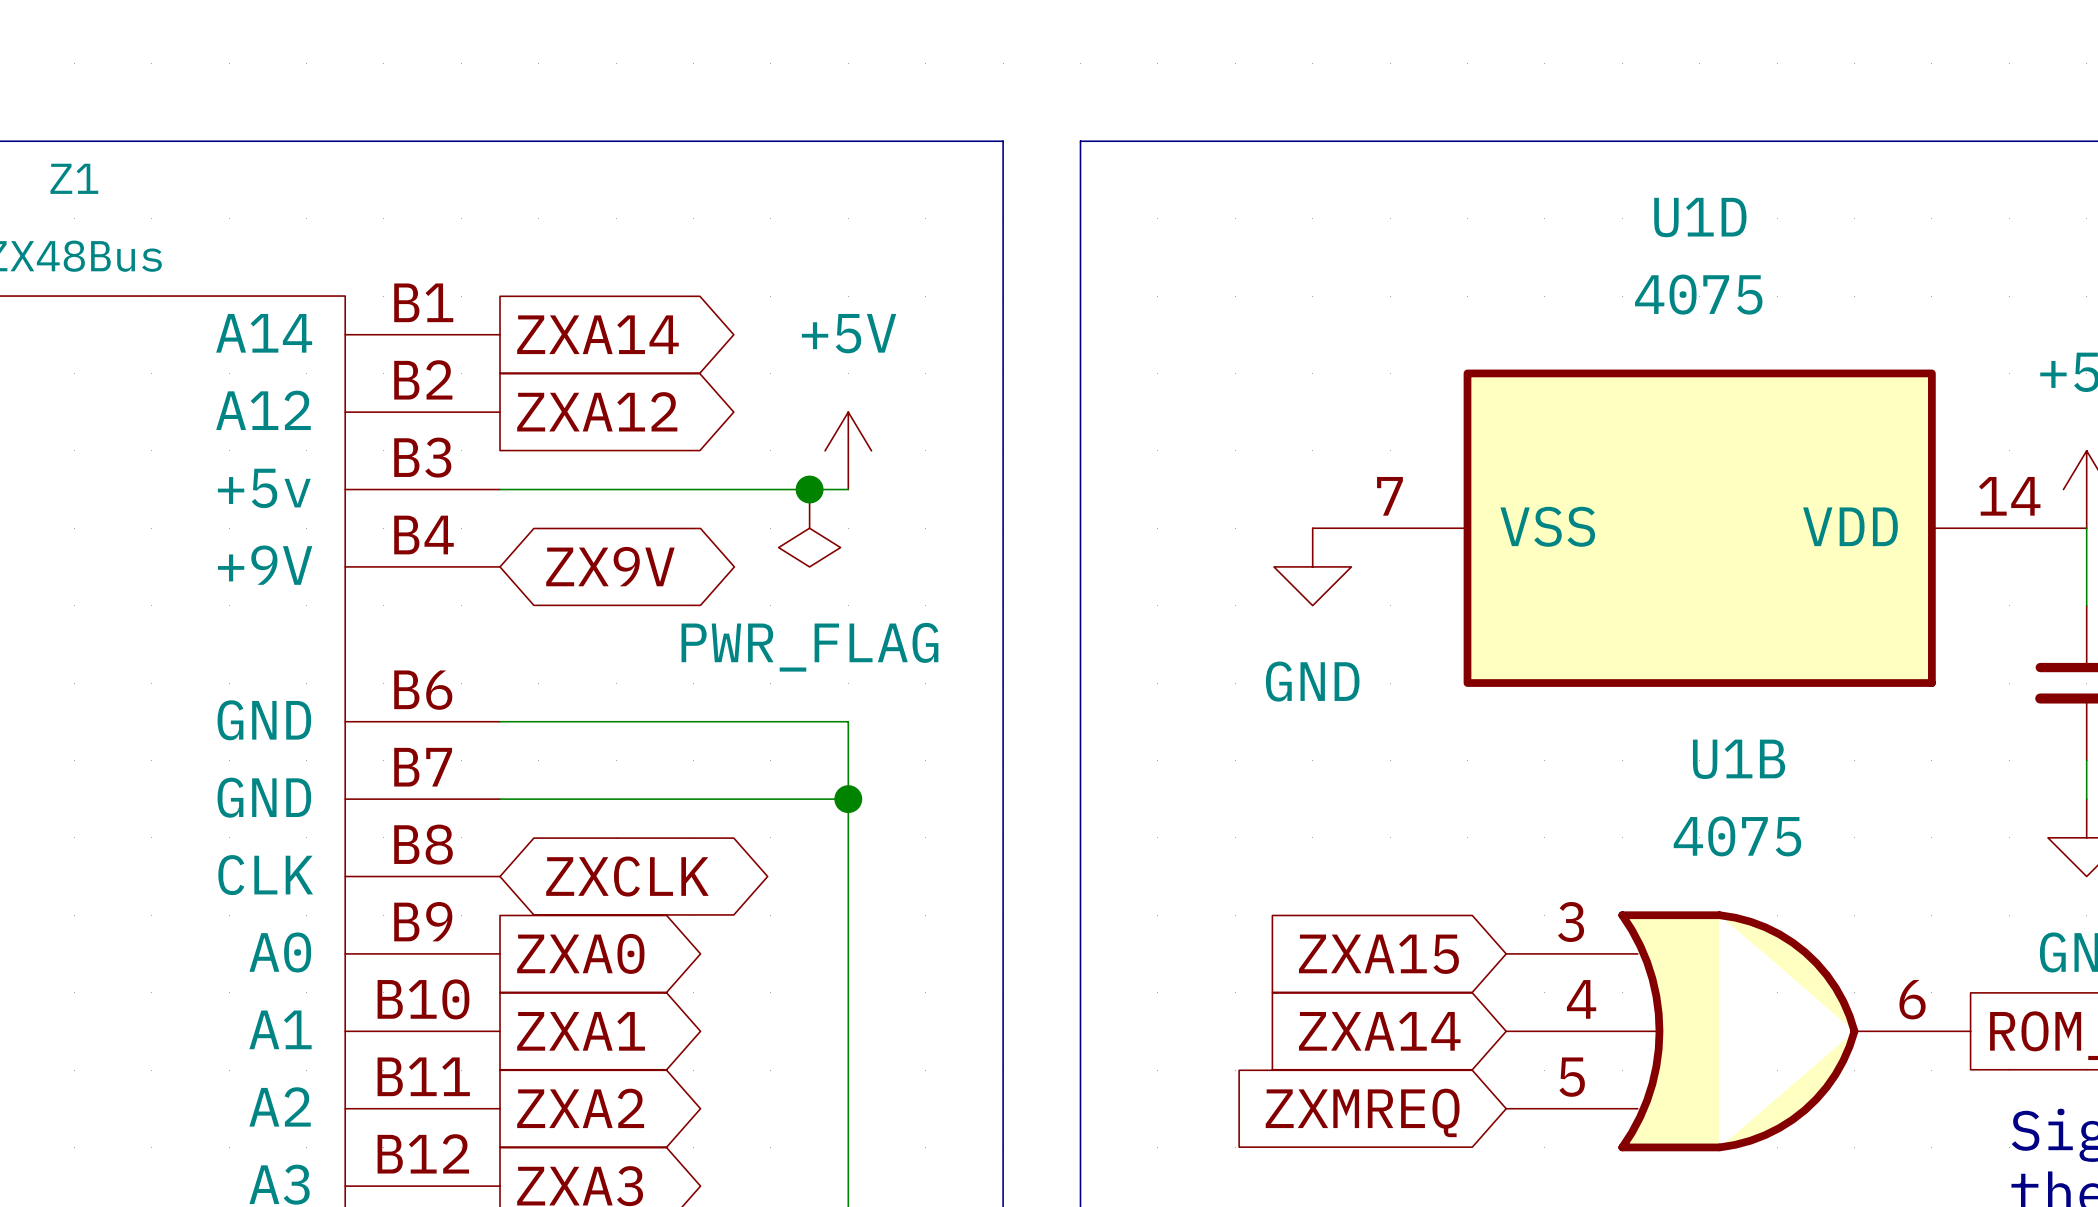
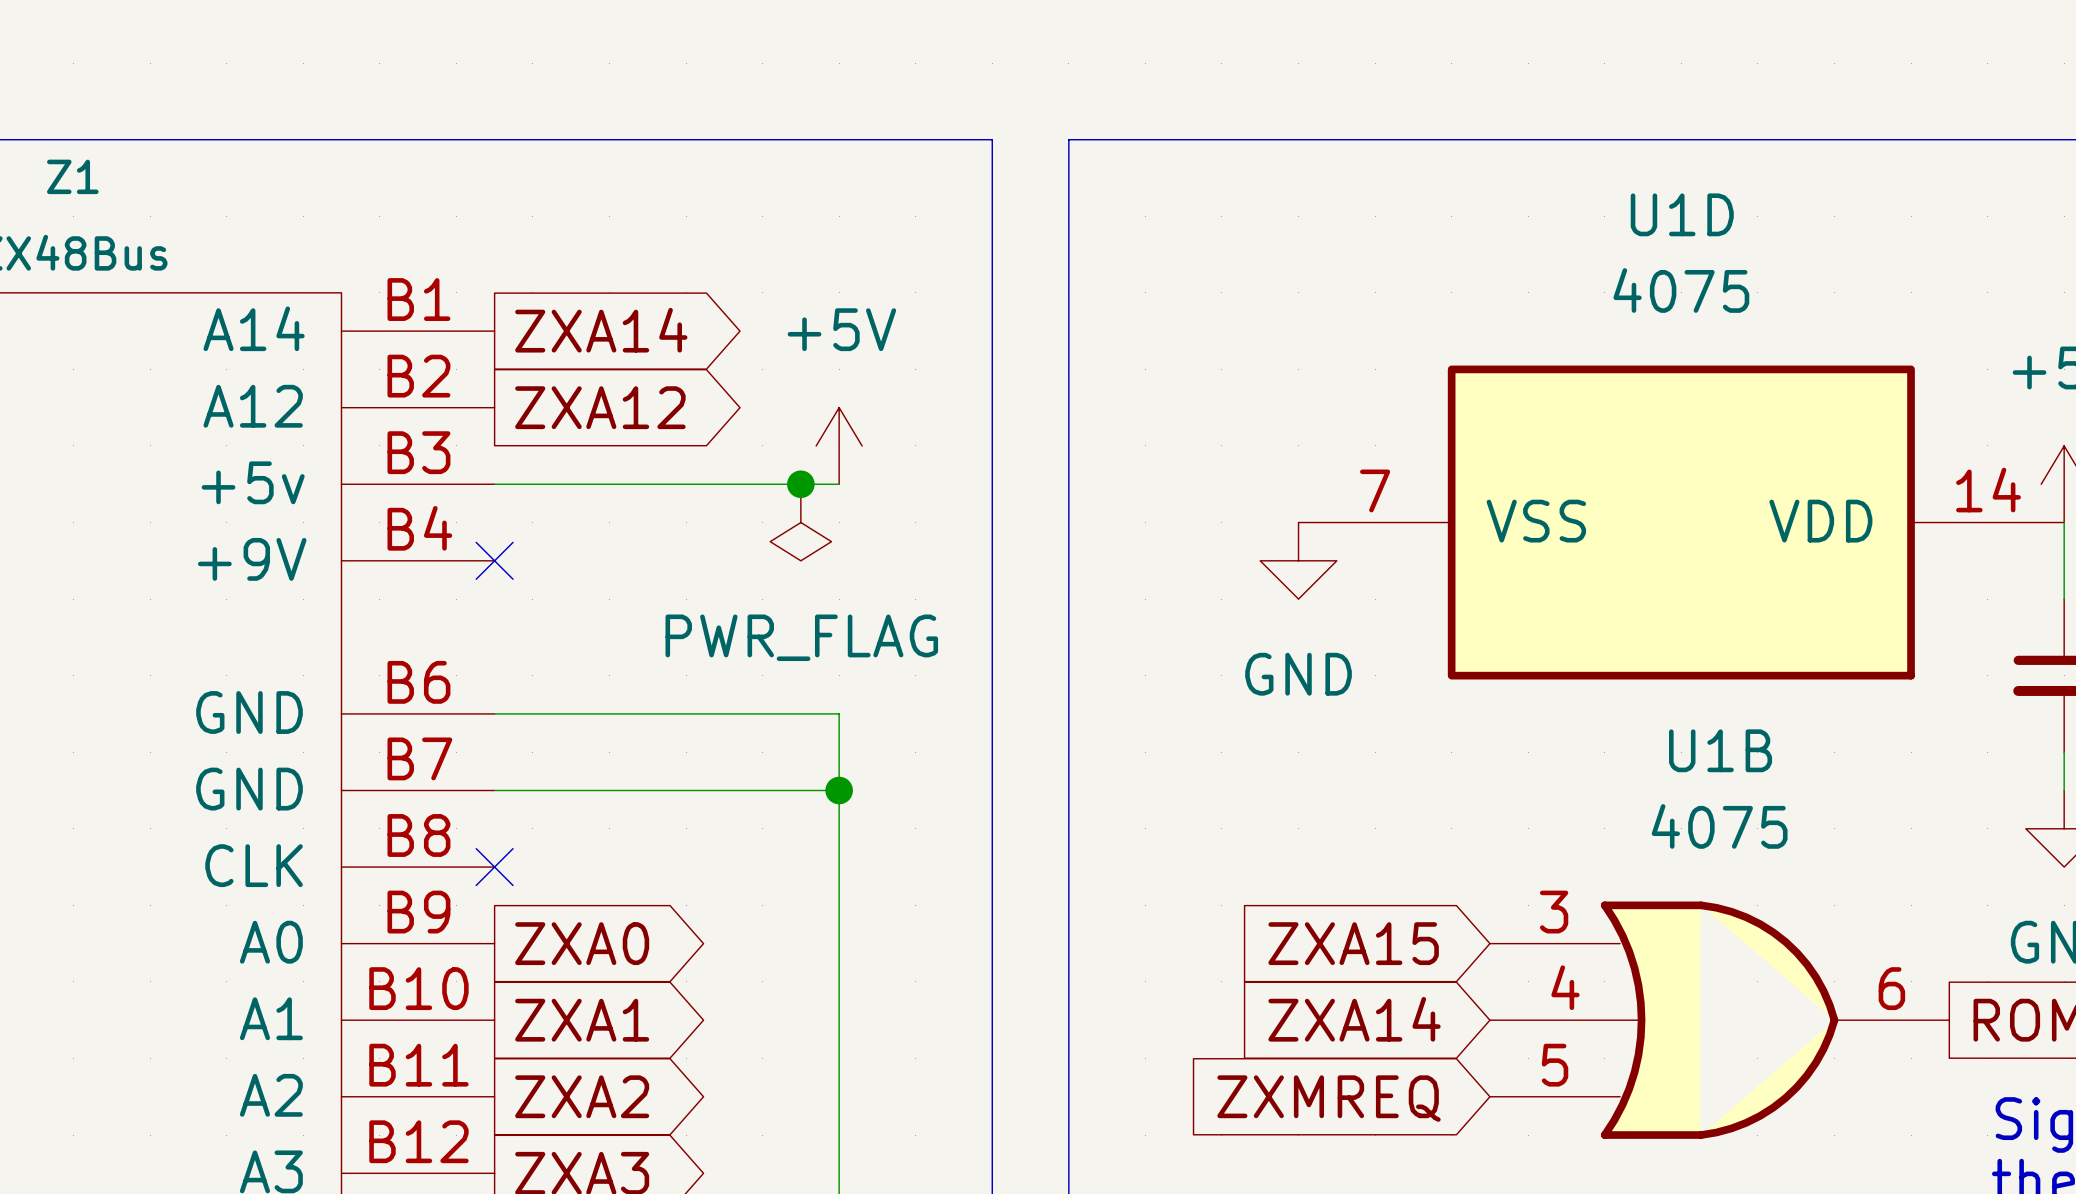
no-connect mark: none -> (494, 560)
global label: ZX9V (610, 566) -> none
no-connect mark: none -> (494, 867)
global label: ZXCLK (627, 876) -> none

